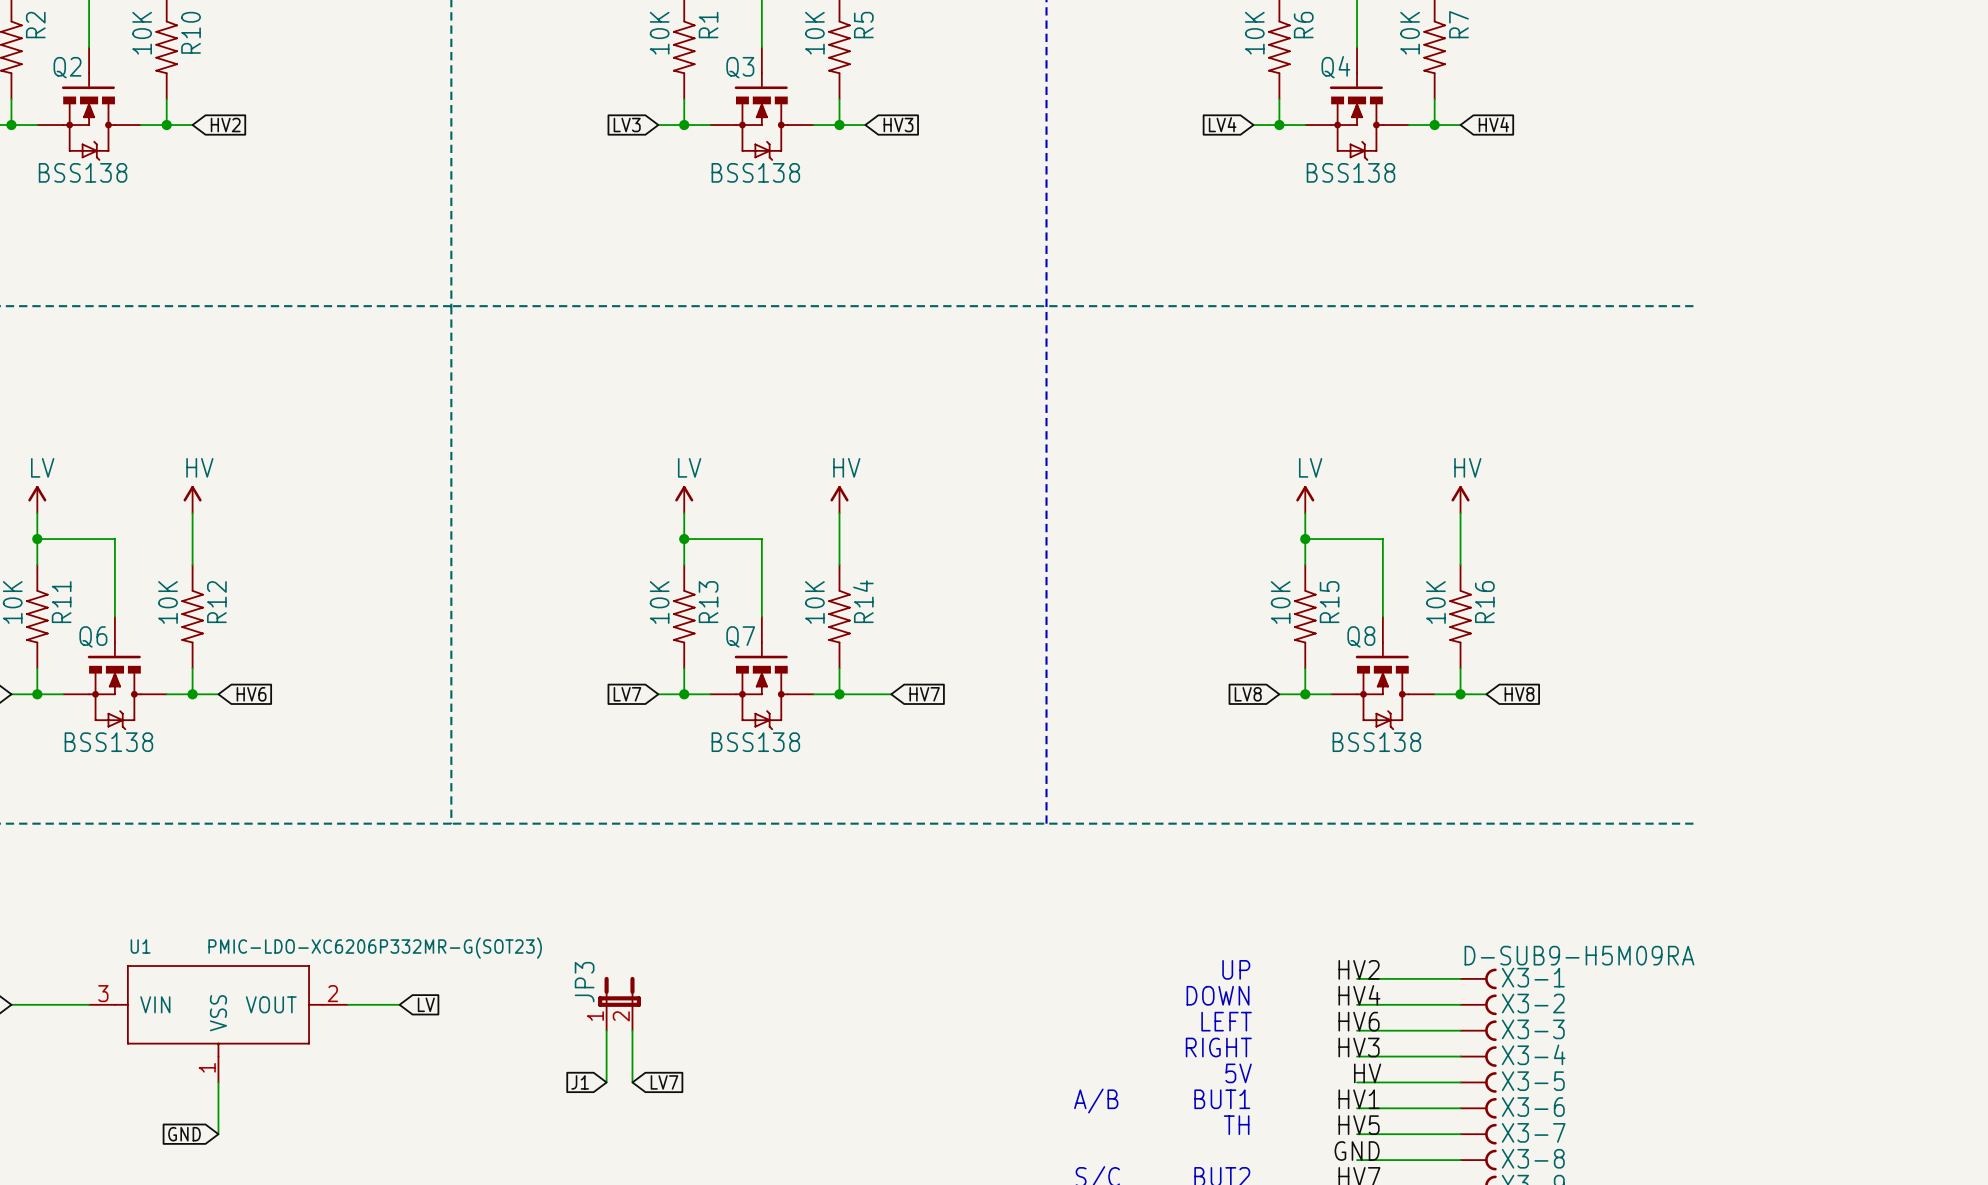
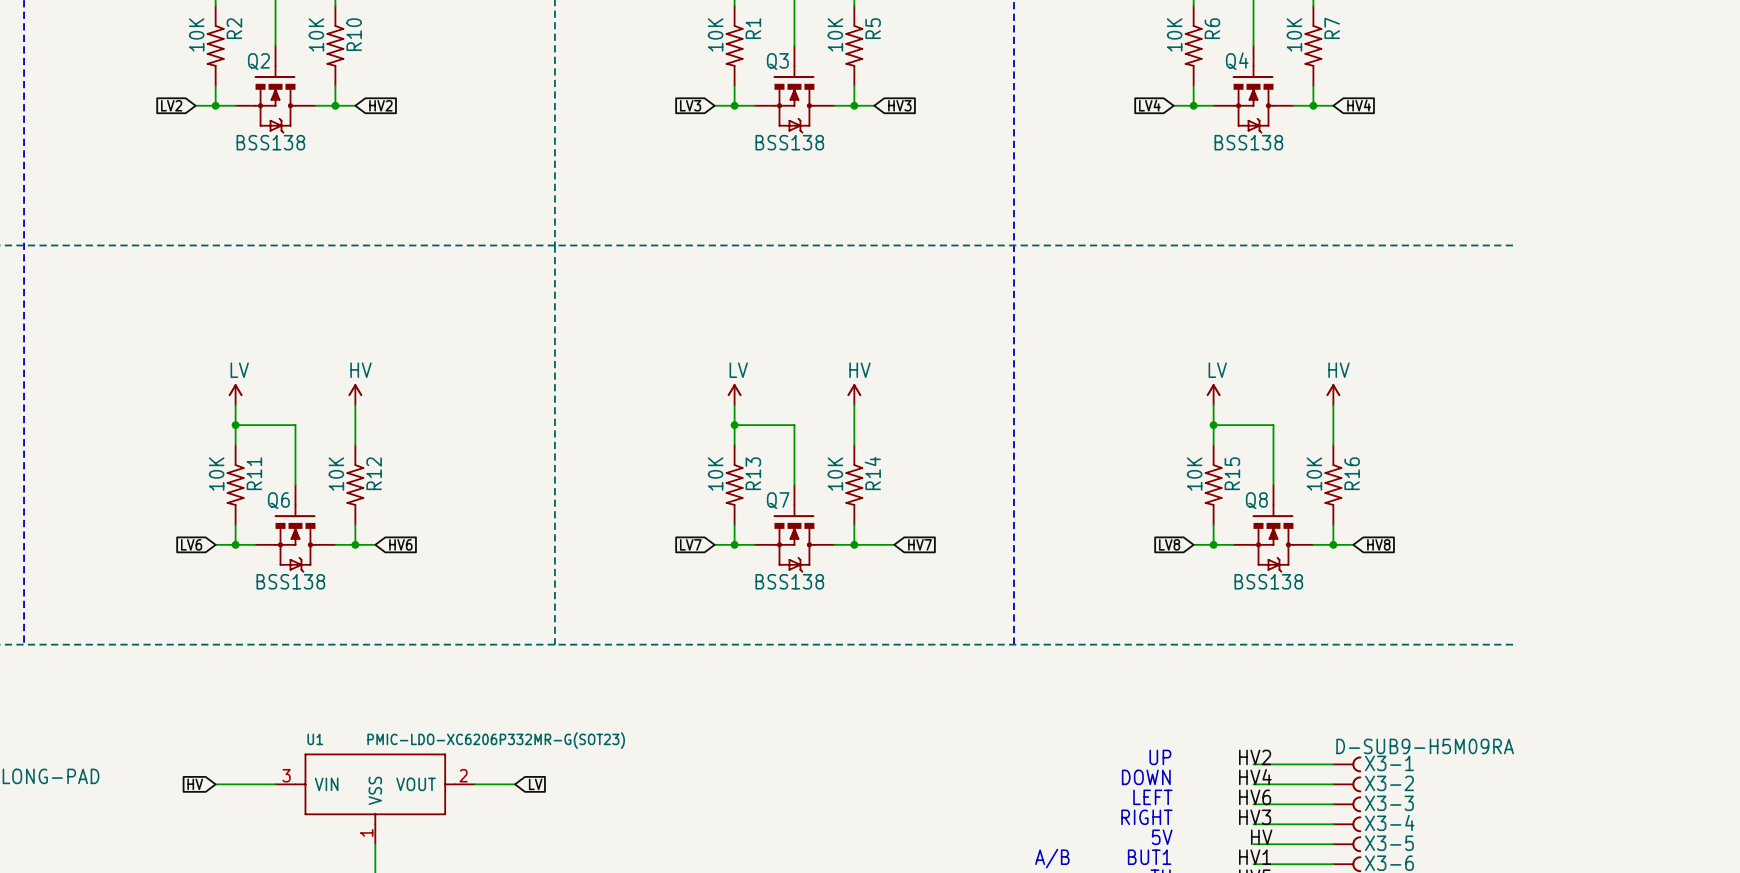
JP3: (619, 1003) -> none
wire: (606, 1030) (606, 1082) -> none
wire: (632, 1030) (632, 1082) -> none
global label: J1 (580, 1082) -> none
global label: LV7 (664, 1082) -> none

